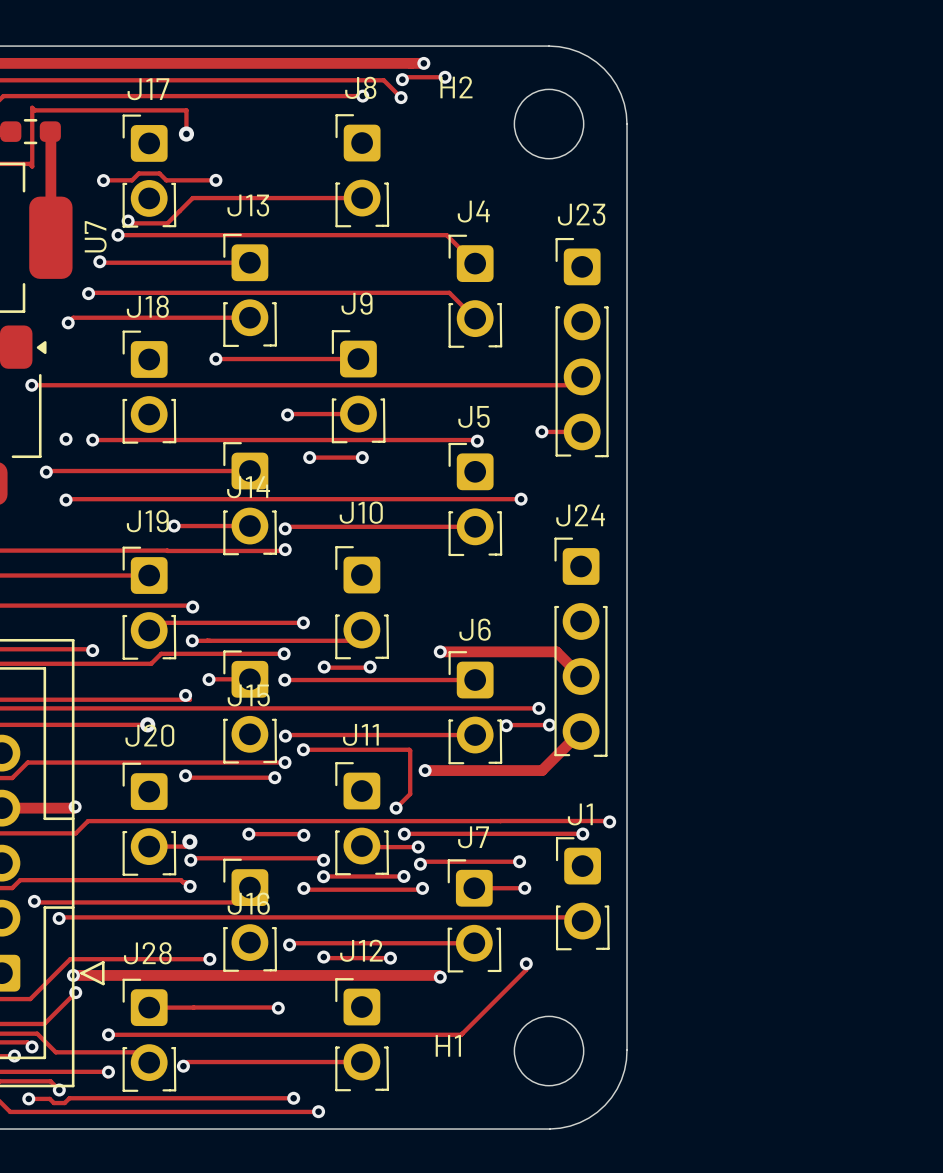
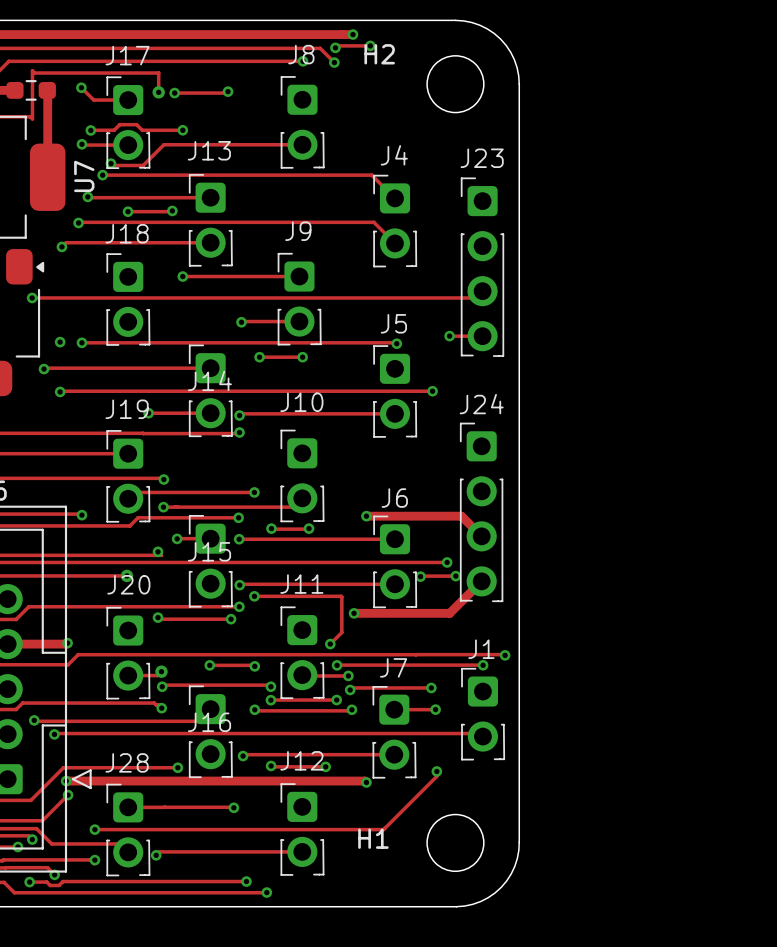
track: none -> (81, 87) (93, 100) (128, 100)
via: none -> (81, 87)
track: none -> (228, 91) (174, 93)
via: none -> (228, 91)
via: none -> (174, 93)
track: none -> (81, 144) (128, 145)
via: none -> (81, 144)
track: none -> (172, 210) (128, 211)
via: none -> (172, 210)
via: none -> (128, 211)

